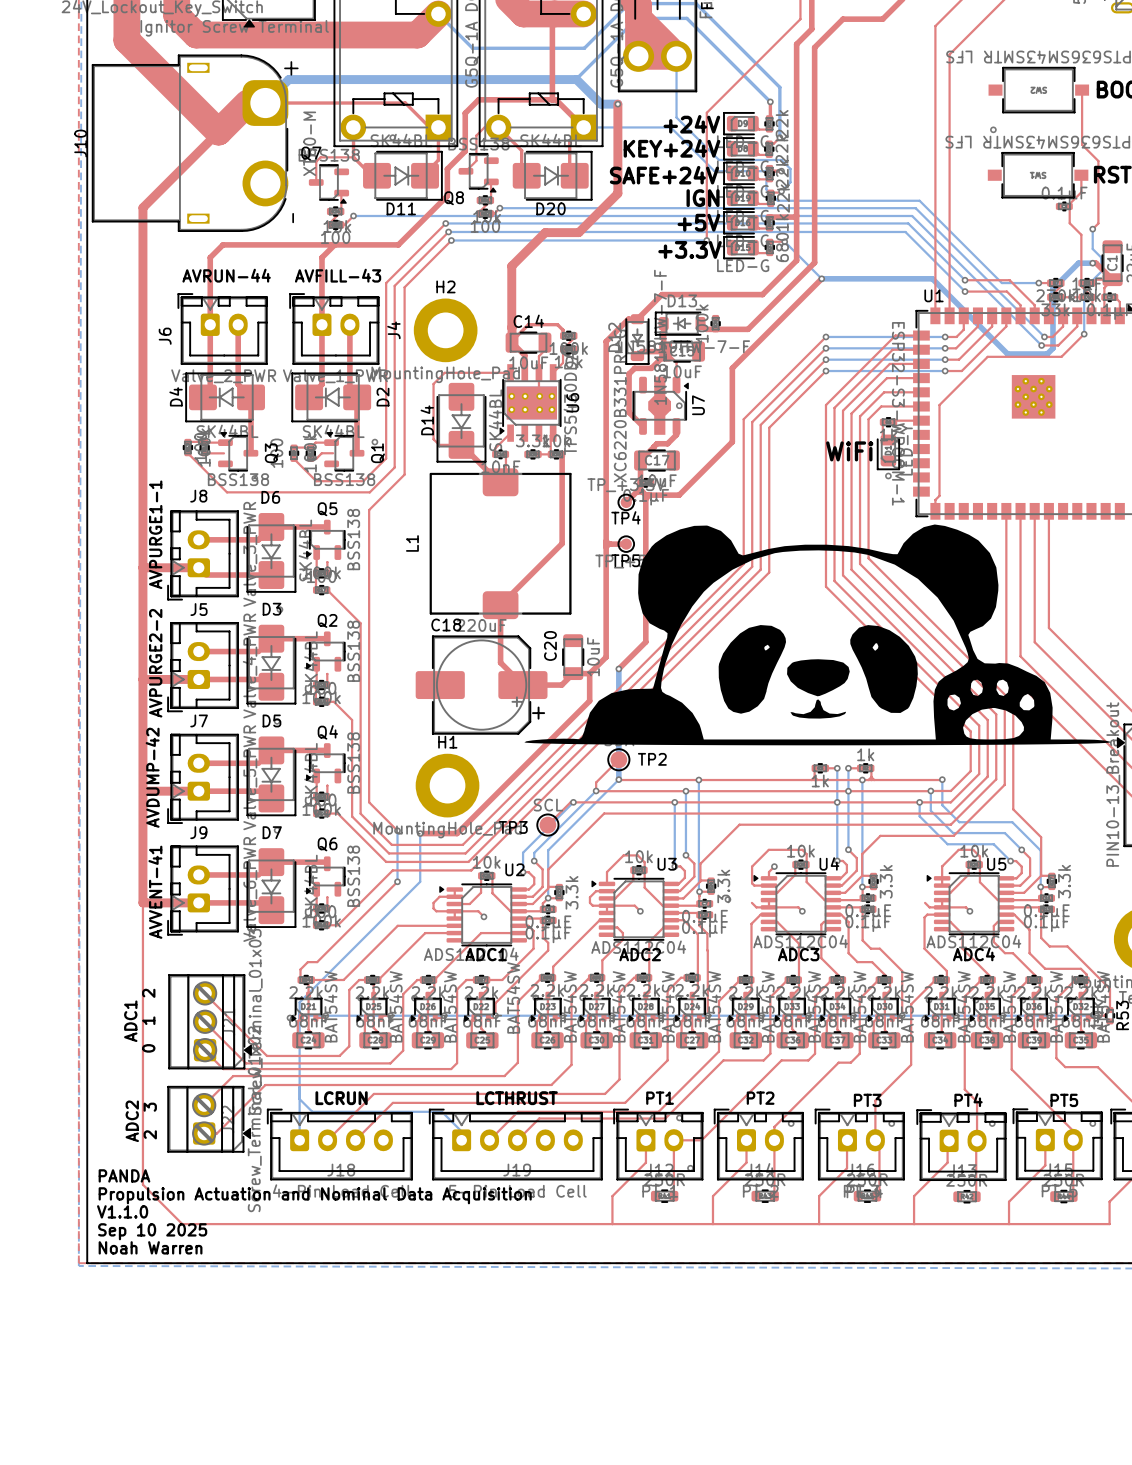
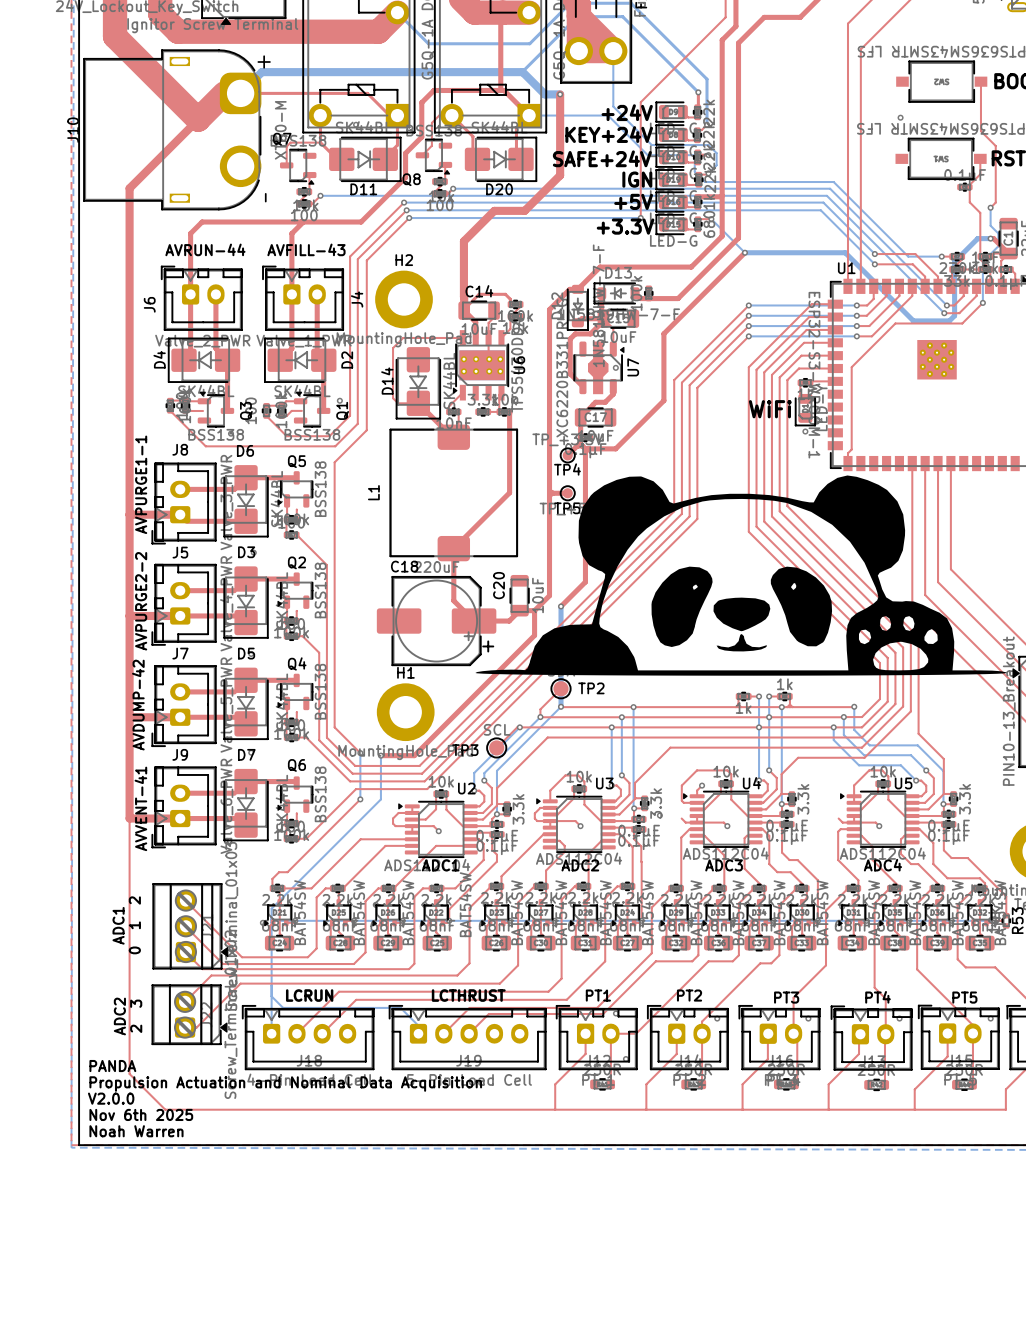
text: V1.1.0 (122, 1211) -> V2.0.0 (111, 1098)
text: Sep 10 2025 (152, 1231) -> Nov 6th 2025 (141, 1114)

